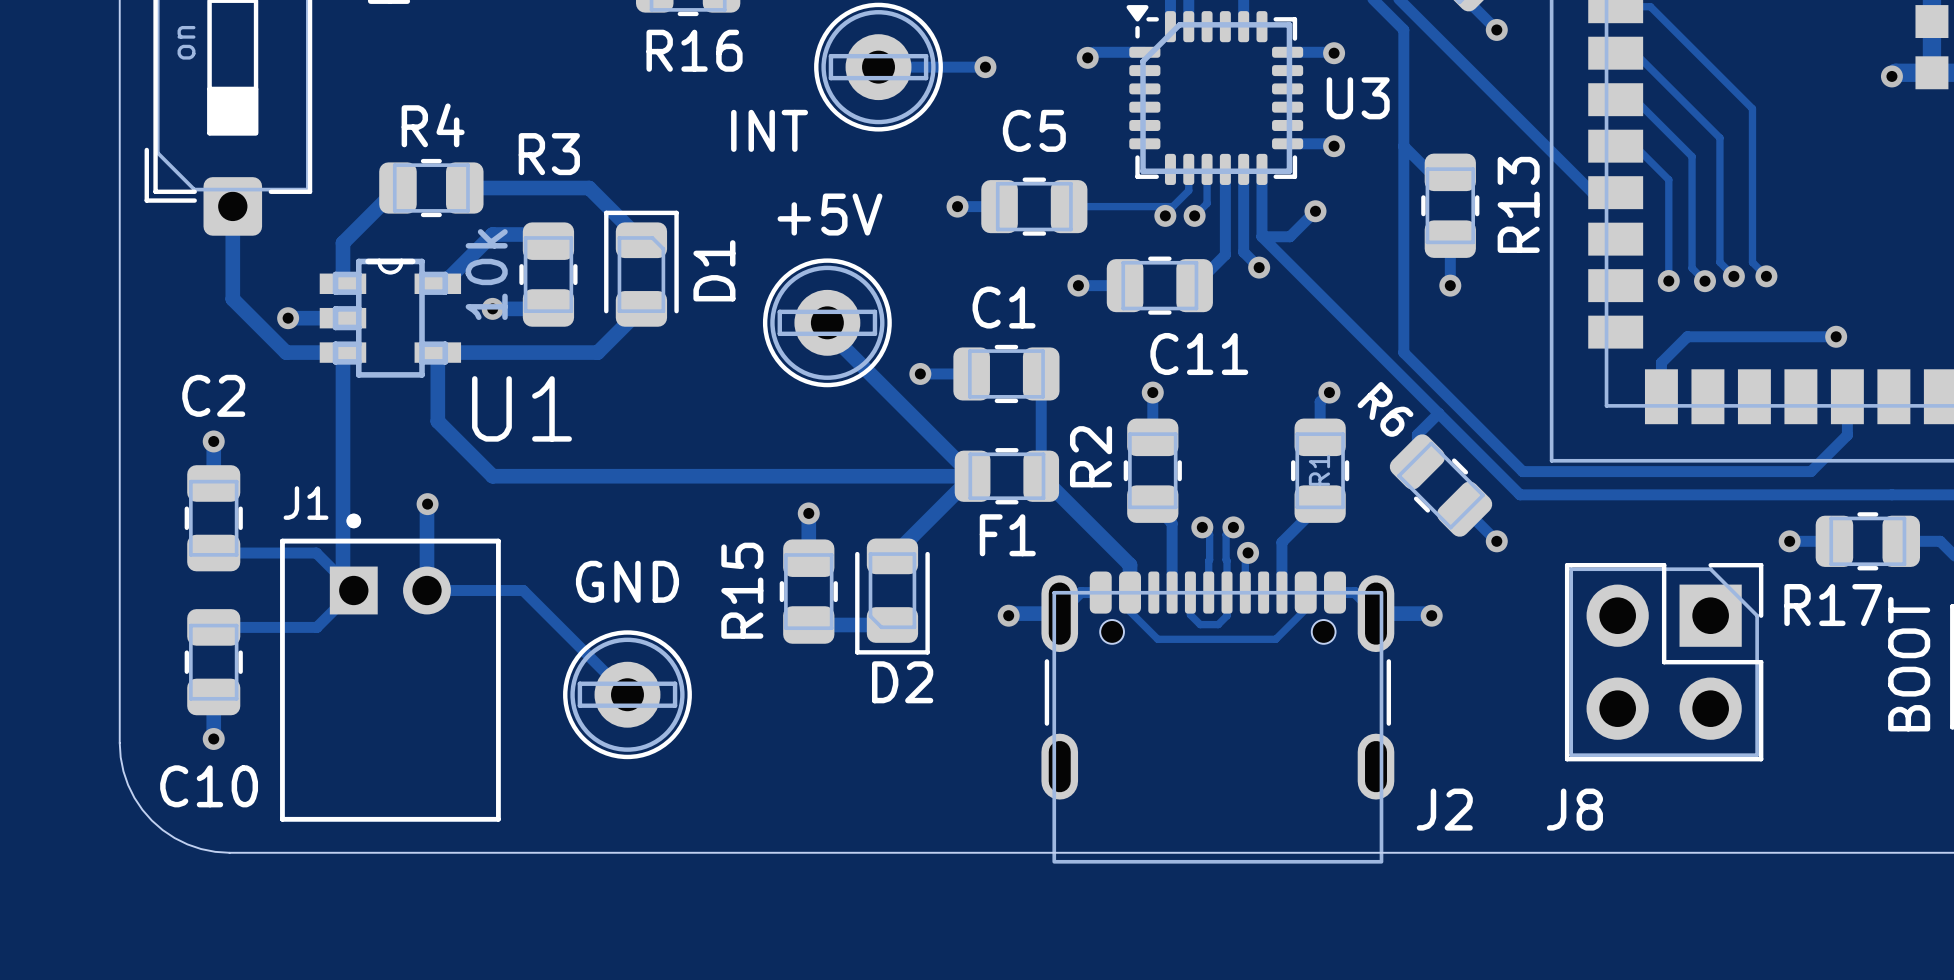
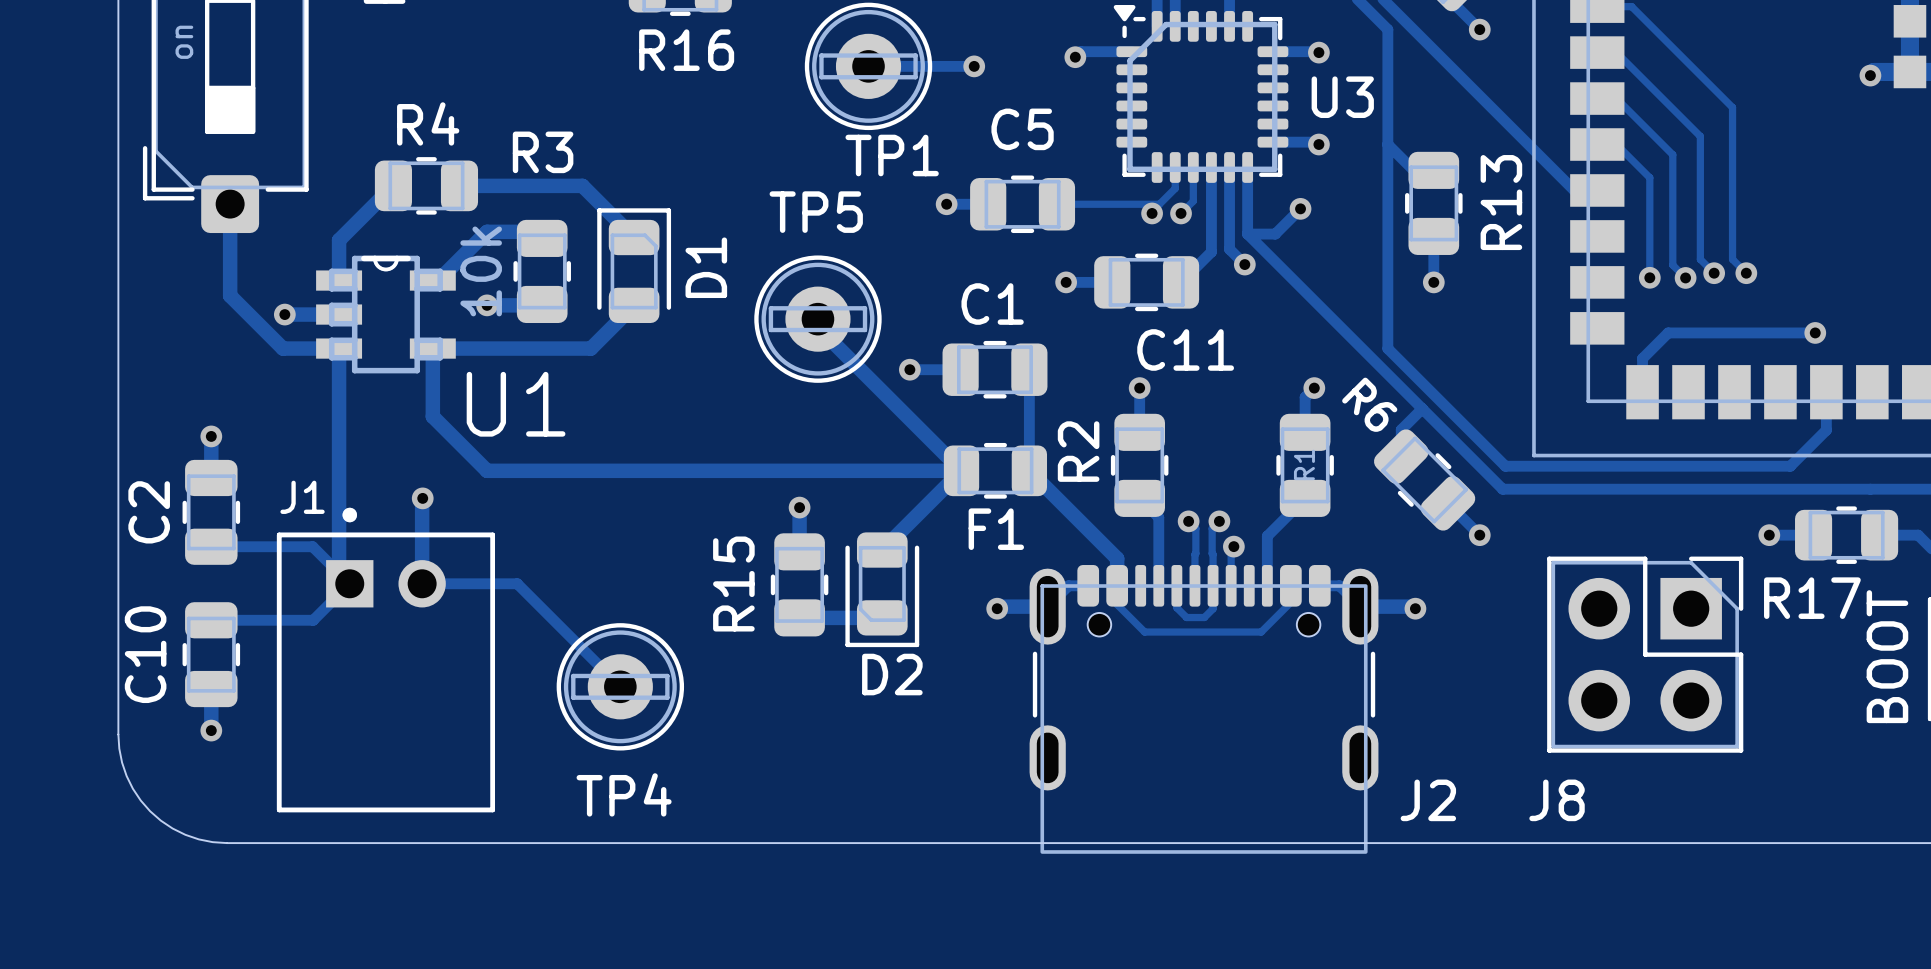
INT name: INT (769, 130) -> TP1 (892, 155)
+5V name: +5V (829, 214) -> TP5 (816, 212)
C2 name rotation: 0° (213, 395) -> 90° counterclockwise (149, 512)
C2 name position: C2 (213, 395) -> C2 (149, 512)
GND name: GND (627, 581) -> TP4 (624, 794)
C10 name rotation: 0° (209, 786) -> 90° counterclockwise (145, 654)
C10 name position: C10 (209, 786) -> C10 (145, 654)

